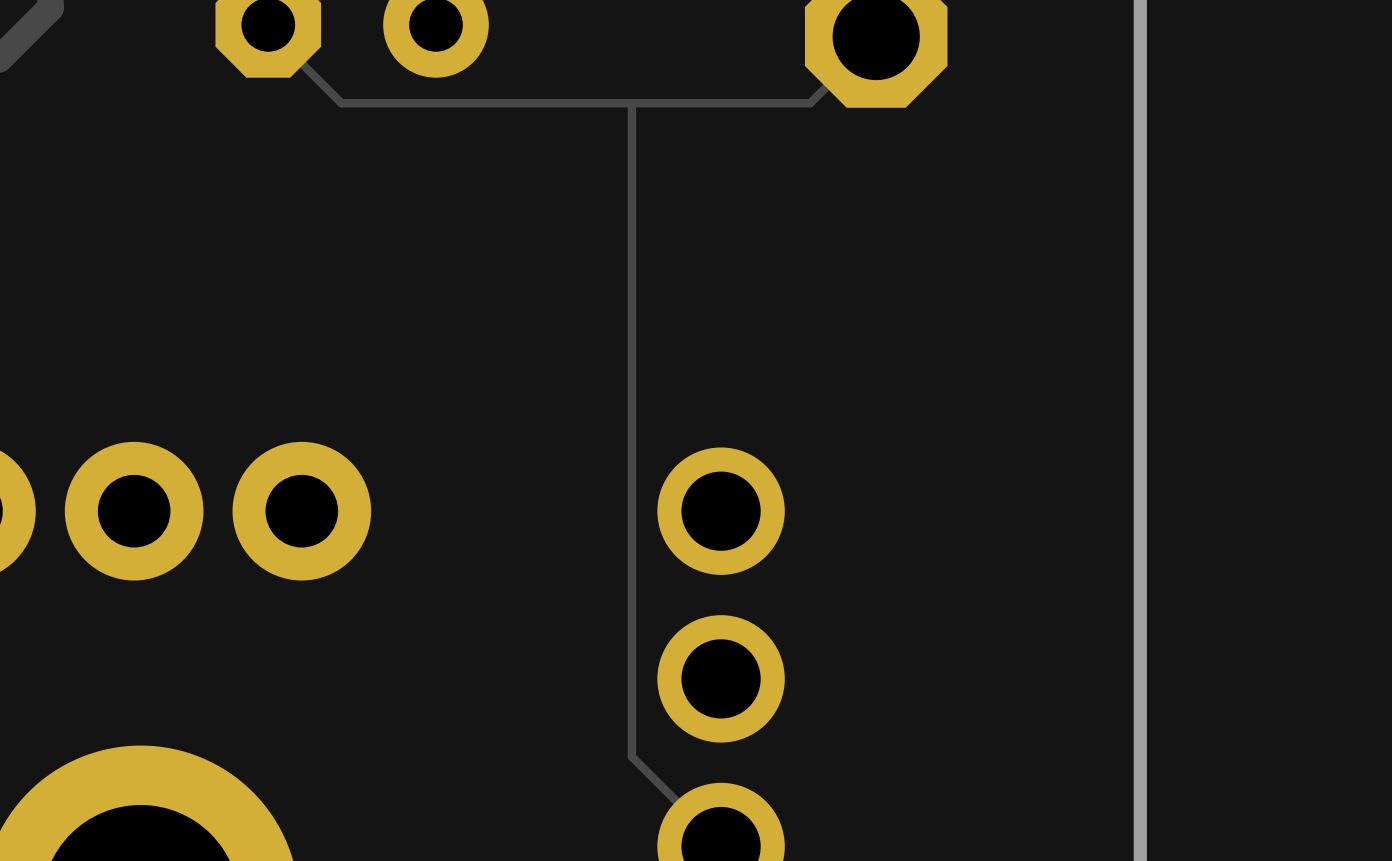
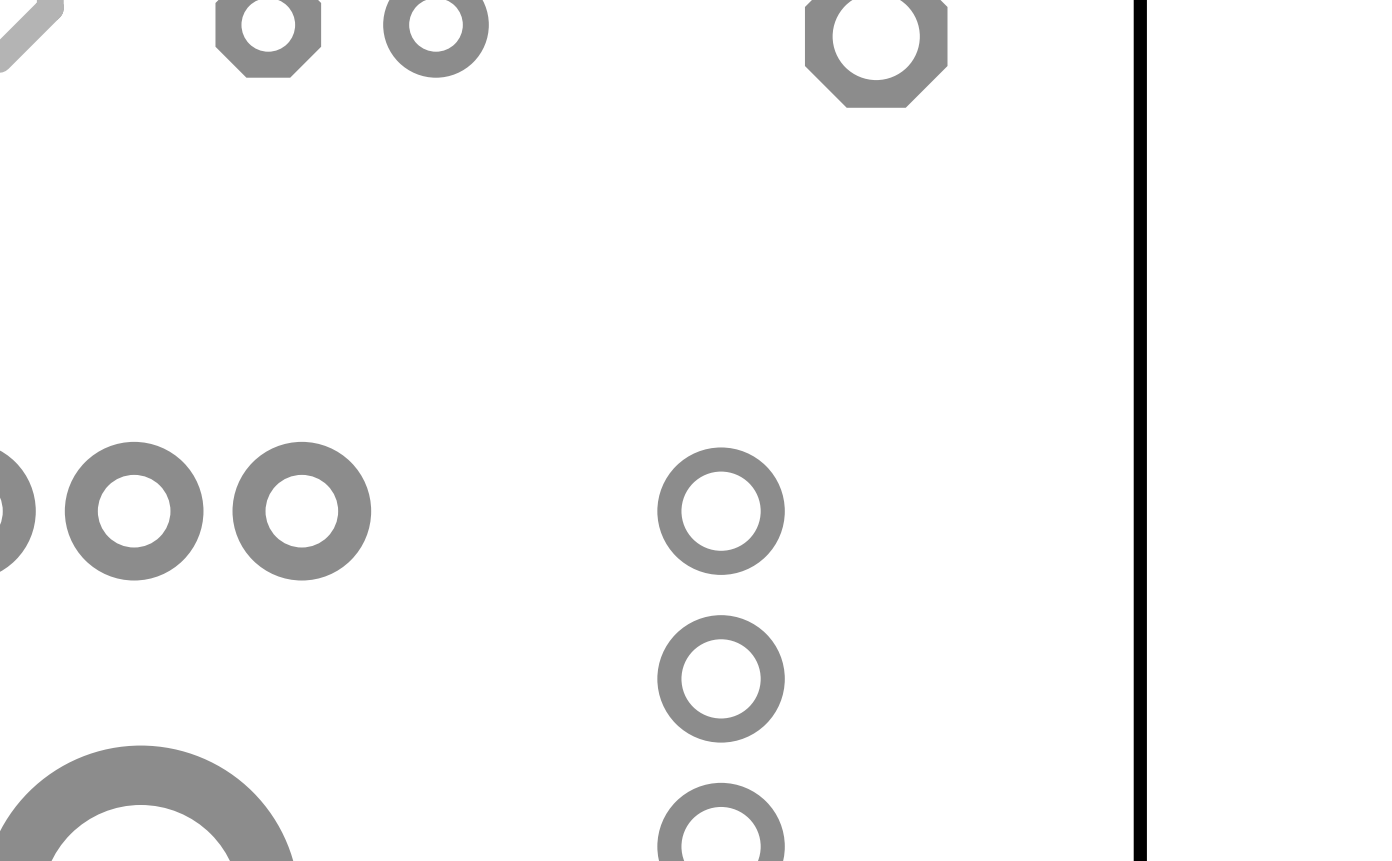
track: (268, 24) (268, 30) (341, 103) (810, 103) (876, 37) -> none
track: (631, 103) (631, 756) (721, 846) -> none

